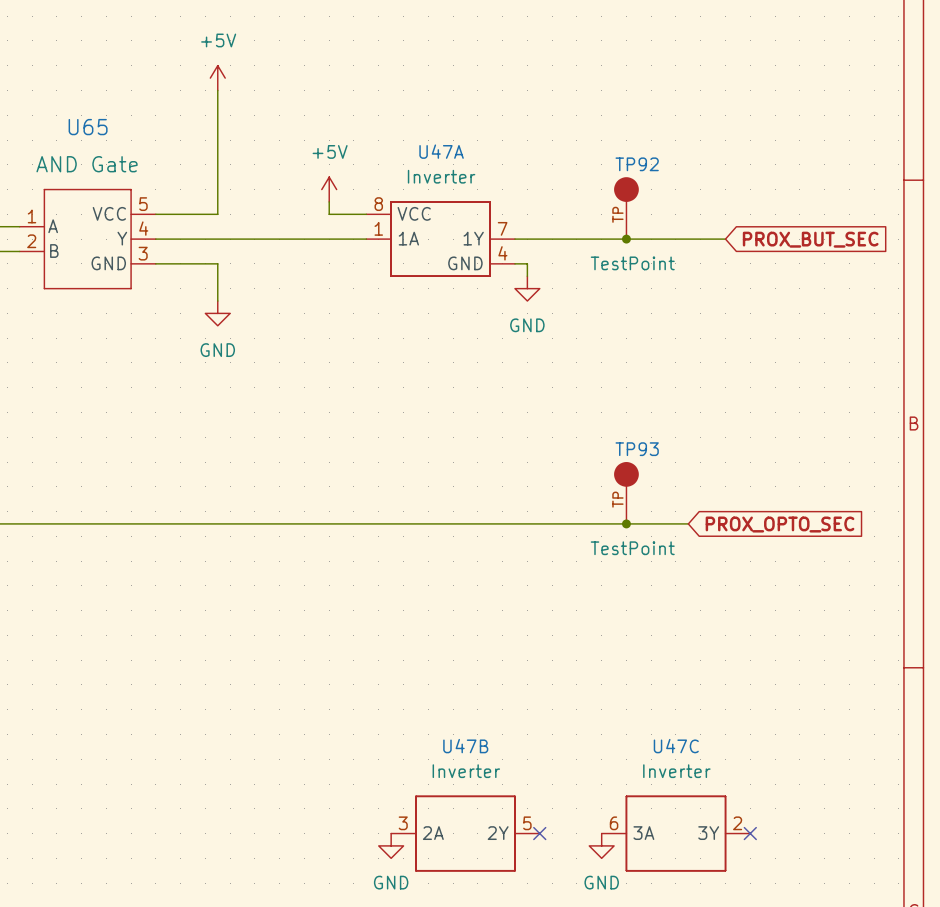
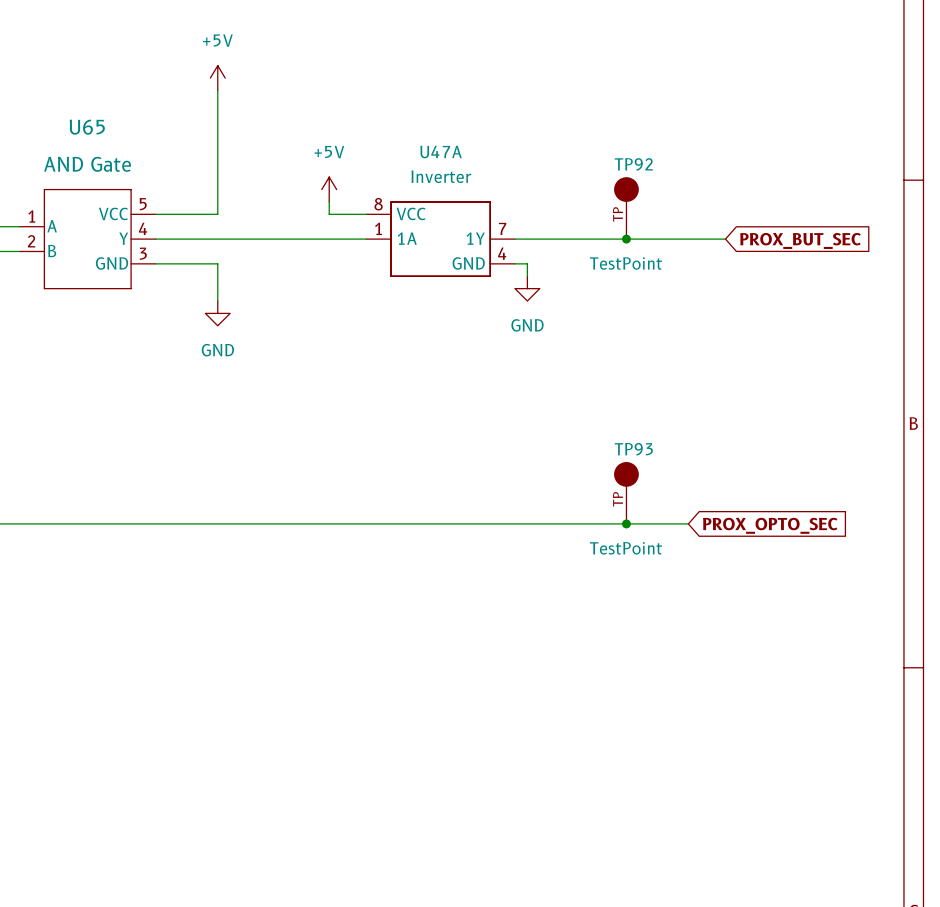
U47B: Inverter (465, 833) -> none
no-connect mark: (539, 833) -> none
U47C: Inverter (675, 833) -> none
no-connect mark: (750, 833) -> none
power symbol: GND (391, 845) -> none
power symbol: GND (601, 845) -> none

